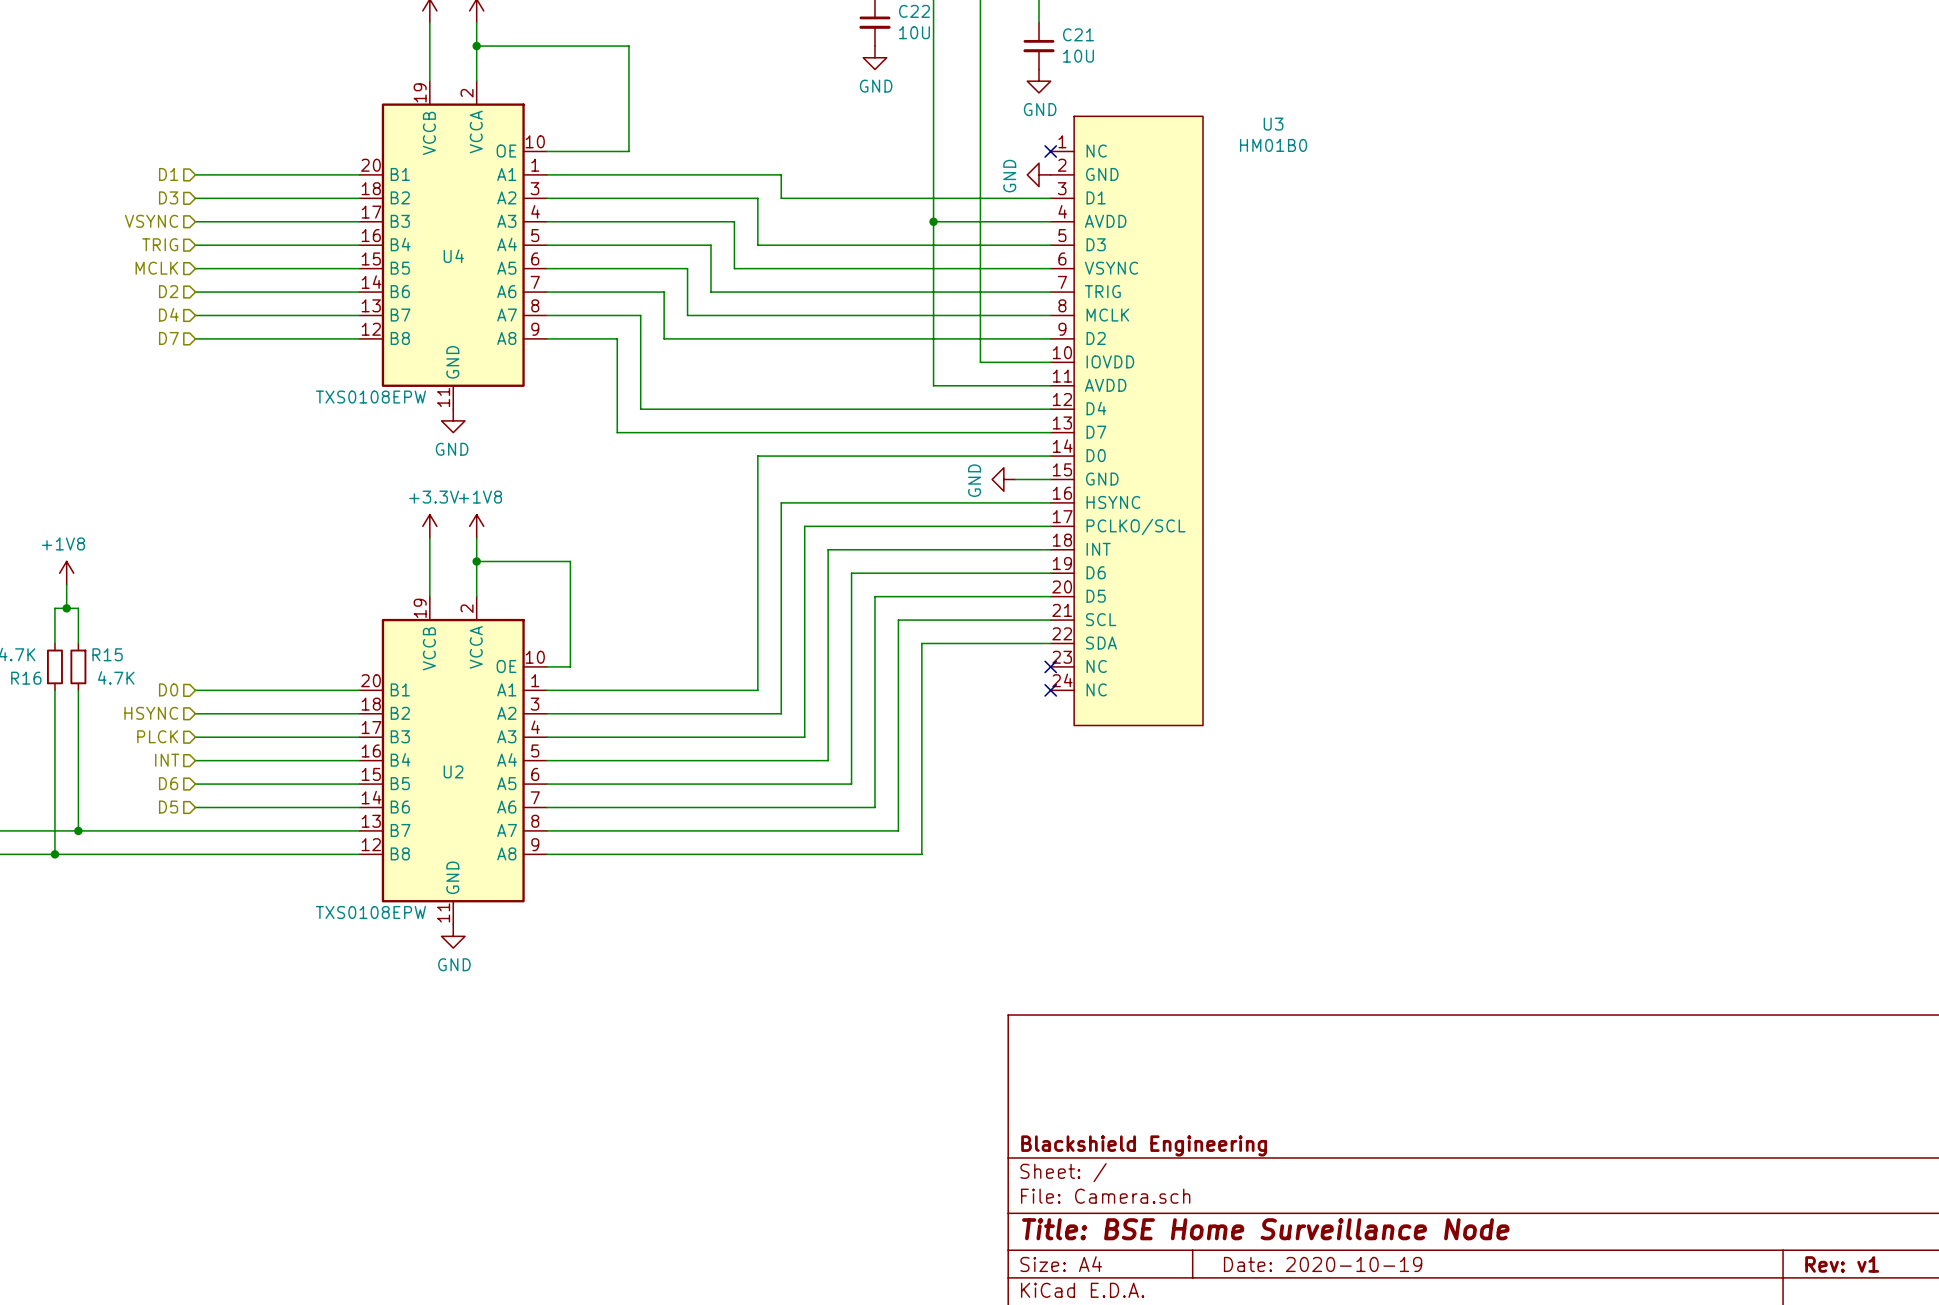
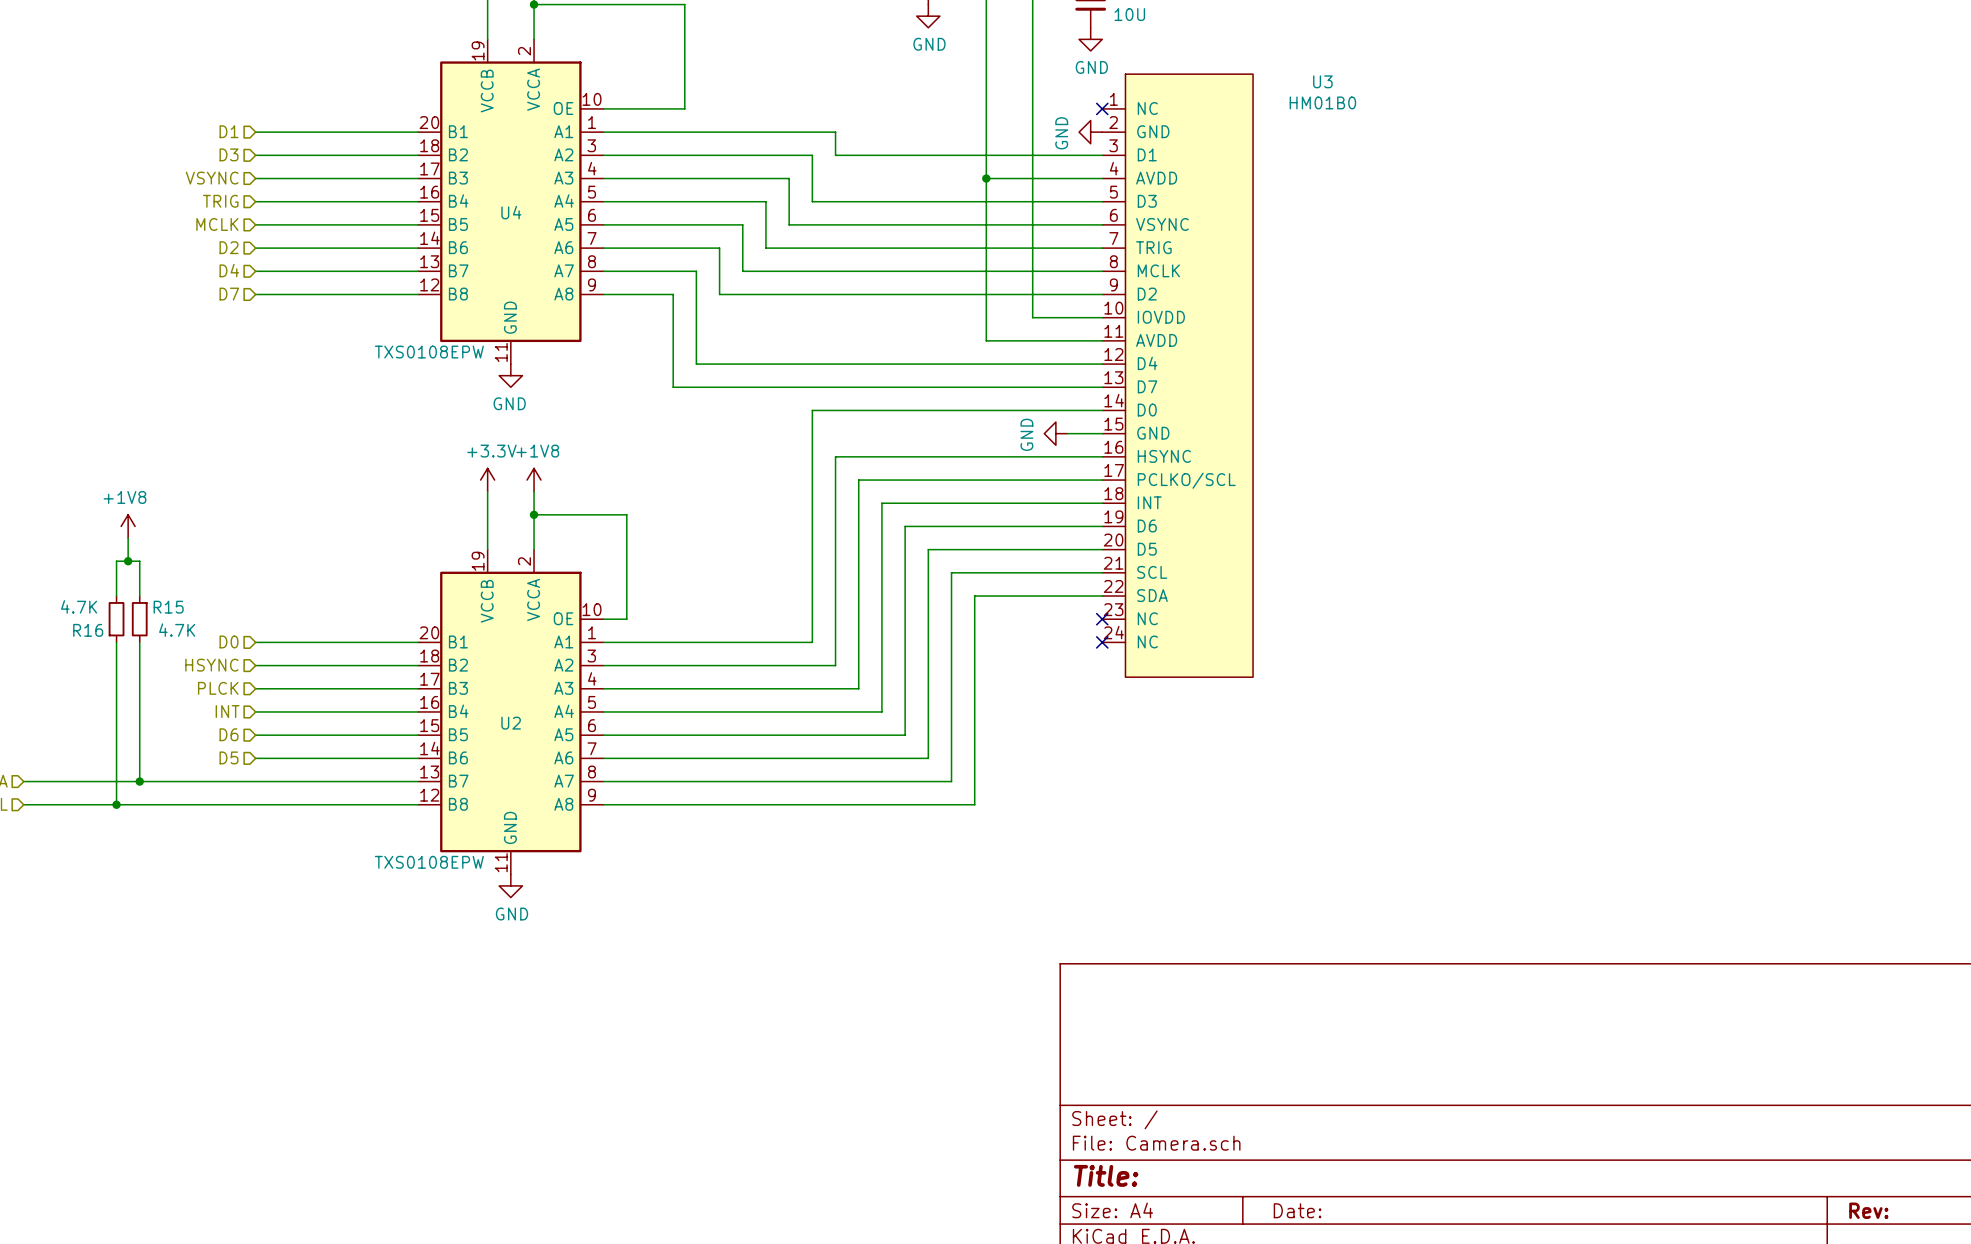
title block: Blackshield Engineering (1144, 1145) -> none
title block: Title: BSE Home Surveillance Node (1265, 1229) -> Title: (1106, 1175)
title block: Date: 2020-10-19 (1323, 1264) -> Date: (1297, 1210)
title block: Rev: v1 (1842, 1264) -> Rev: (1868, 1210)

